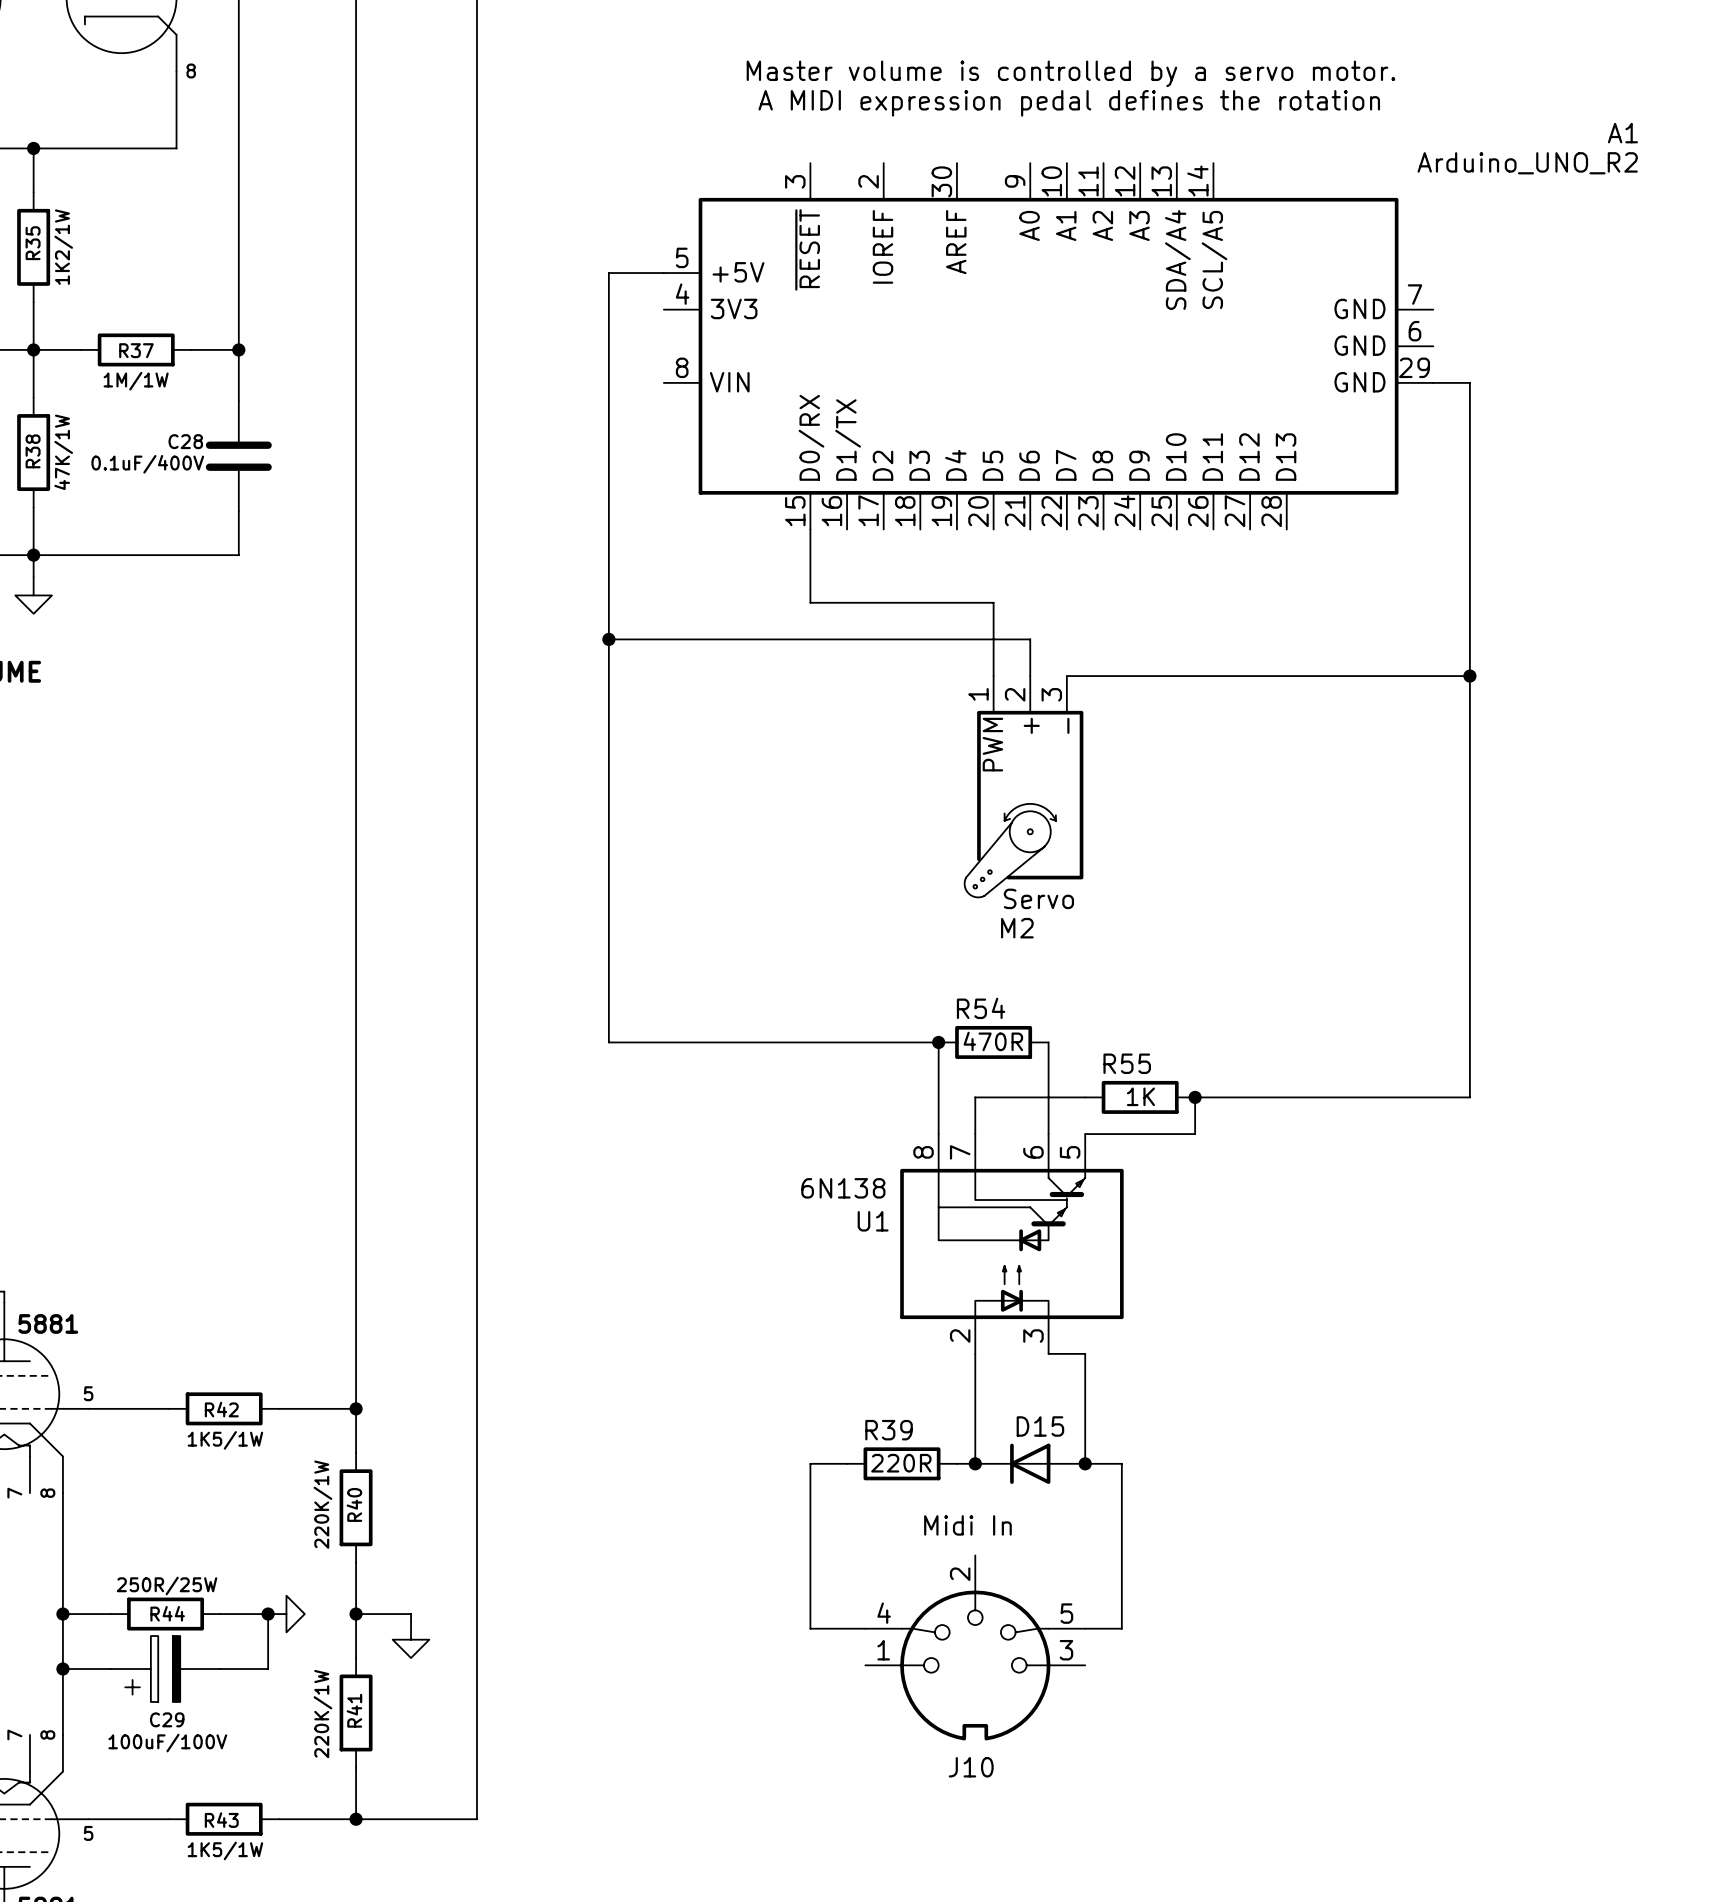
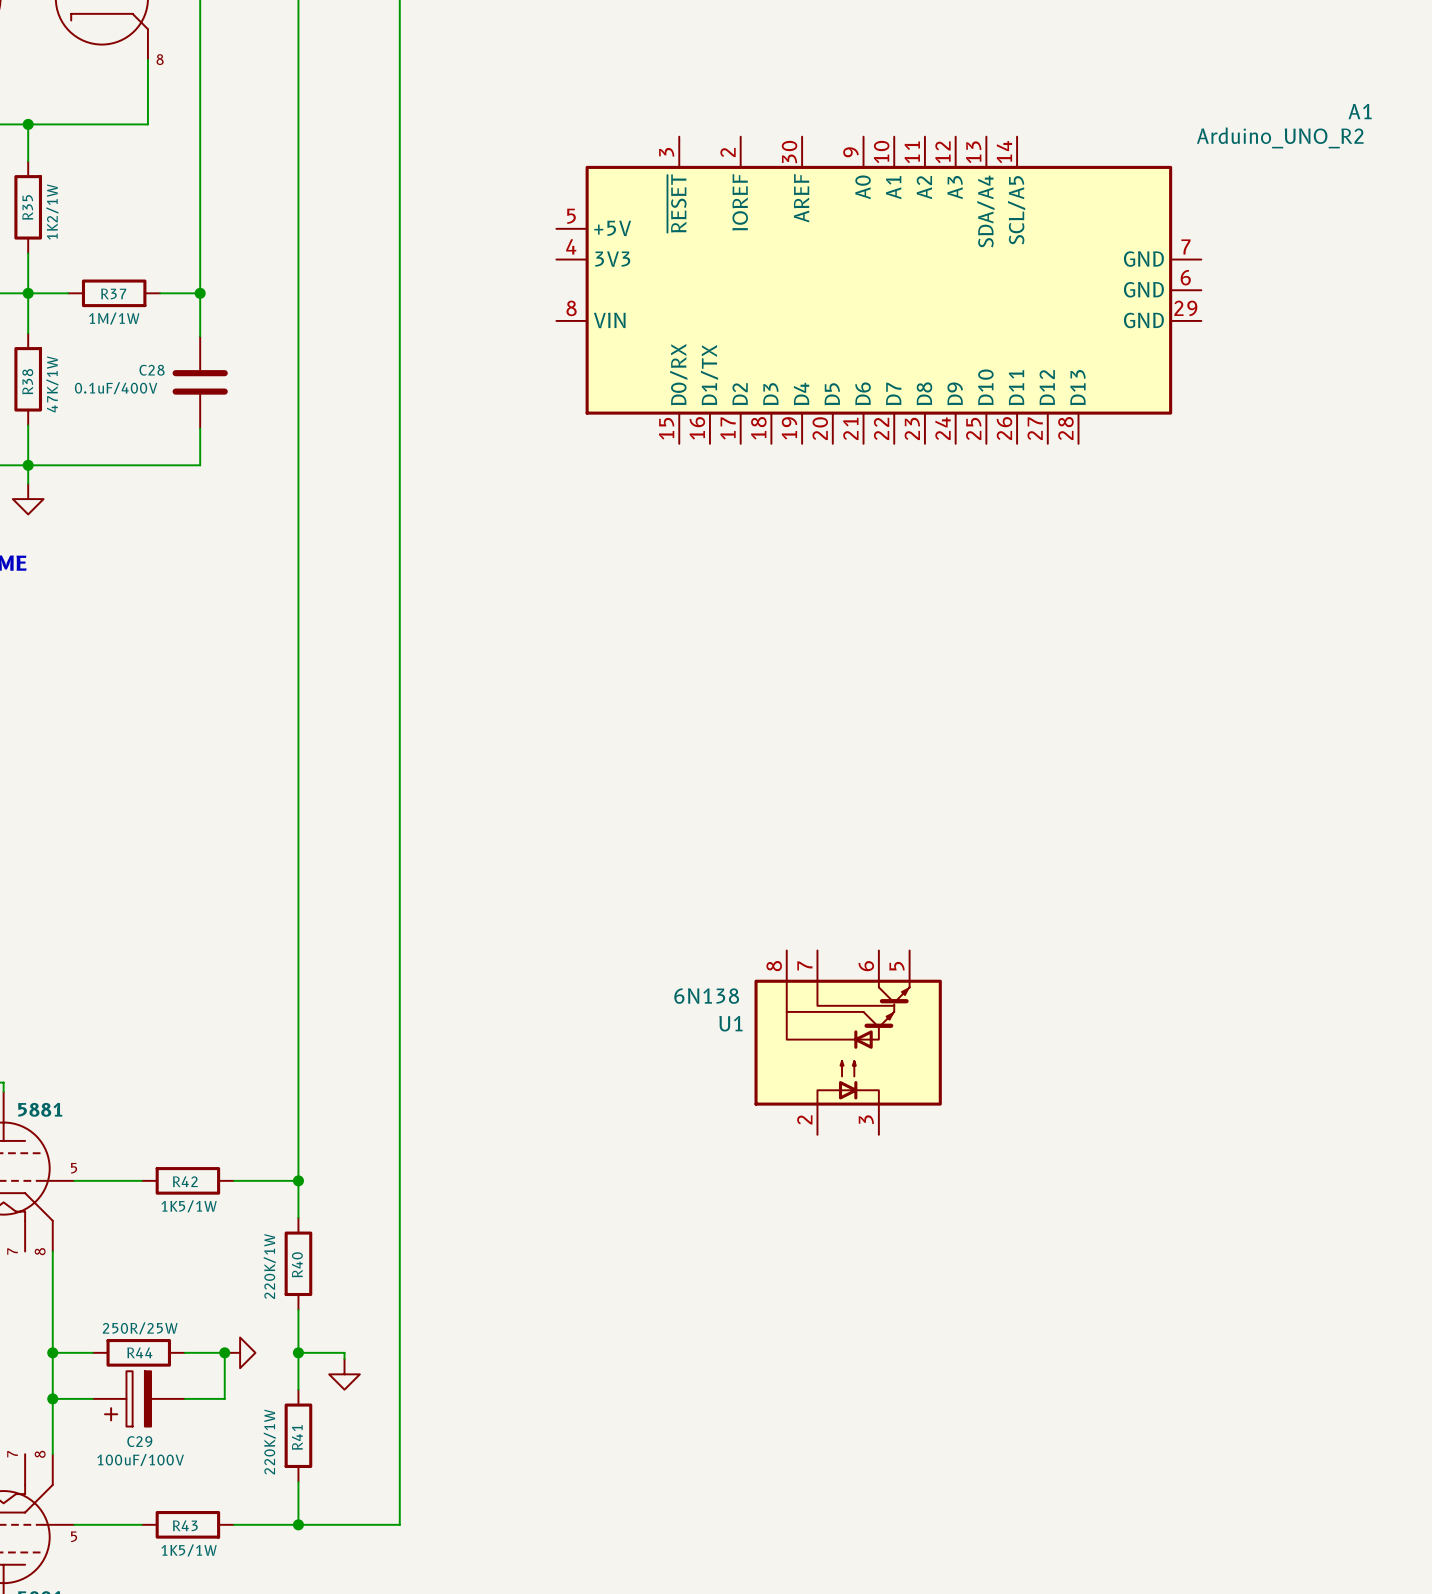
text: Master volume is controlled by a servo motor. (1070, 73) -> none
text: A MIDI expression pedal defines the rotation (1069, 103) -> none
wire: (663, 273) (608, 273) (608, 1042) (938, 1042) (938, 1134) -> none
wire: (1433, 382) (1469, 382) (1469, 1097) (1195, 1097) (1195, 1134) (1085, 1134) -> none
wire: (810, 529) (810, 602) (993, 602) (993, 676) -> none
wire: (608, 639) (1030, 639) (1030, 676) -> none
junction: (608, 639) -> none
wire: (1066, 676) (1469, 676) -> none
junction: (1469, 676) -> none
M2: Servo (1024, 786) -> none
junction: (938, 1042) -> none
R54: 470R (993, 1042) -> none
wire: (1048, 1042) (1048, 1134) -> none
wire: (1085, 1097) (975, 1097) (975, 1134) -> none
R55: 1K (1140, 1097) -> none
junction: (1195, 1097) -> none
wire: (975, 1353) (975, 1463) (956, 1463) -> none
wire: (1048, 1353) (1085, 1353) (1085, 1463) (1121, 1463) (1121, 1628) (1085, 1628) -> none
wire: (847, 1463) (810, 1463) (810, 1628) (865, 1628) -> none
R39: 220R (902, 1463) -> none
junction: (975, 1463) -> none
D15: (1030, 1463) -> none
junction: (1085, 1463) -> none
J10: Midi In (975, 1647) -> none

